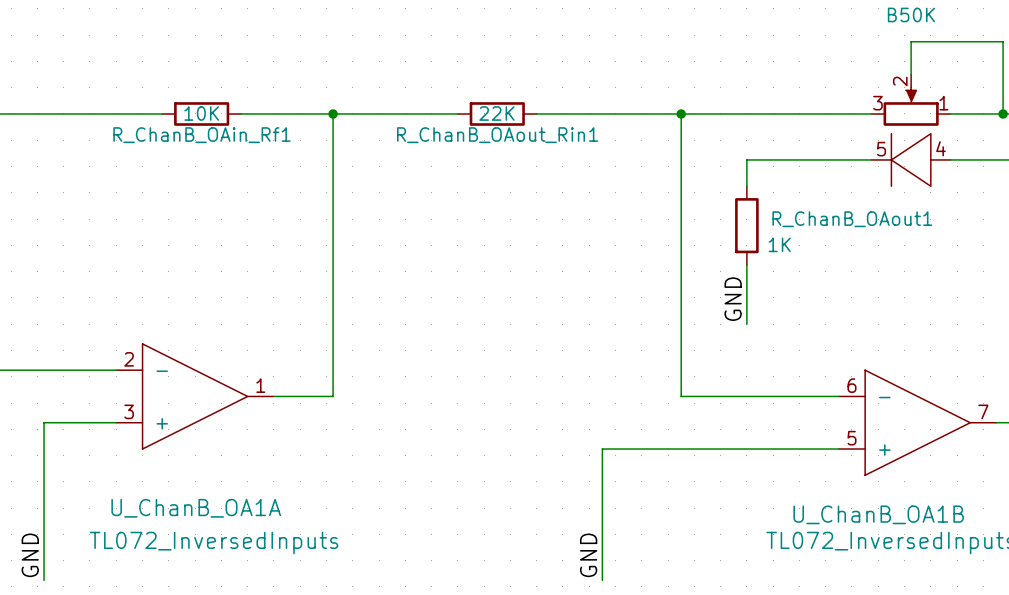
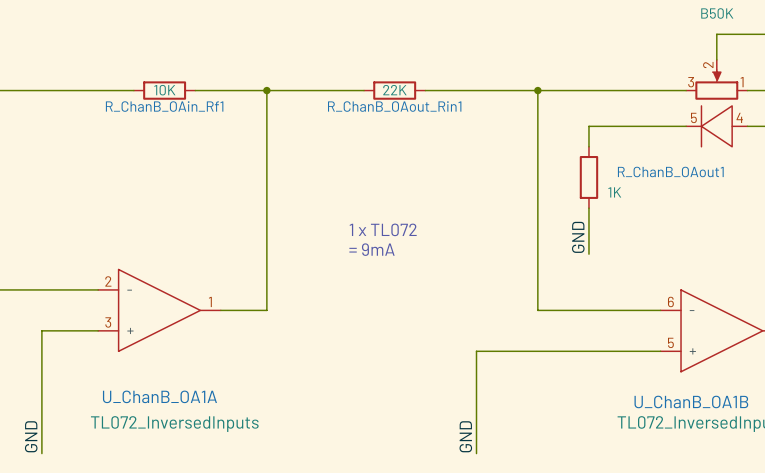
text: none -> 1 x TL072 (383, 229)
text: none -> = 9mA (371, 249)

